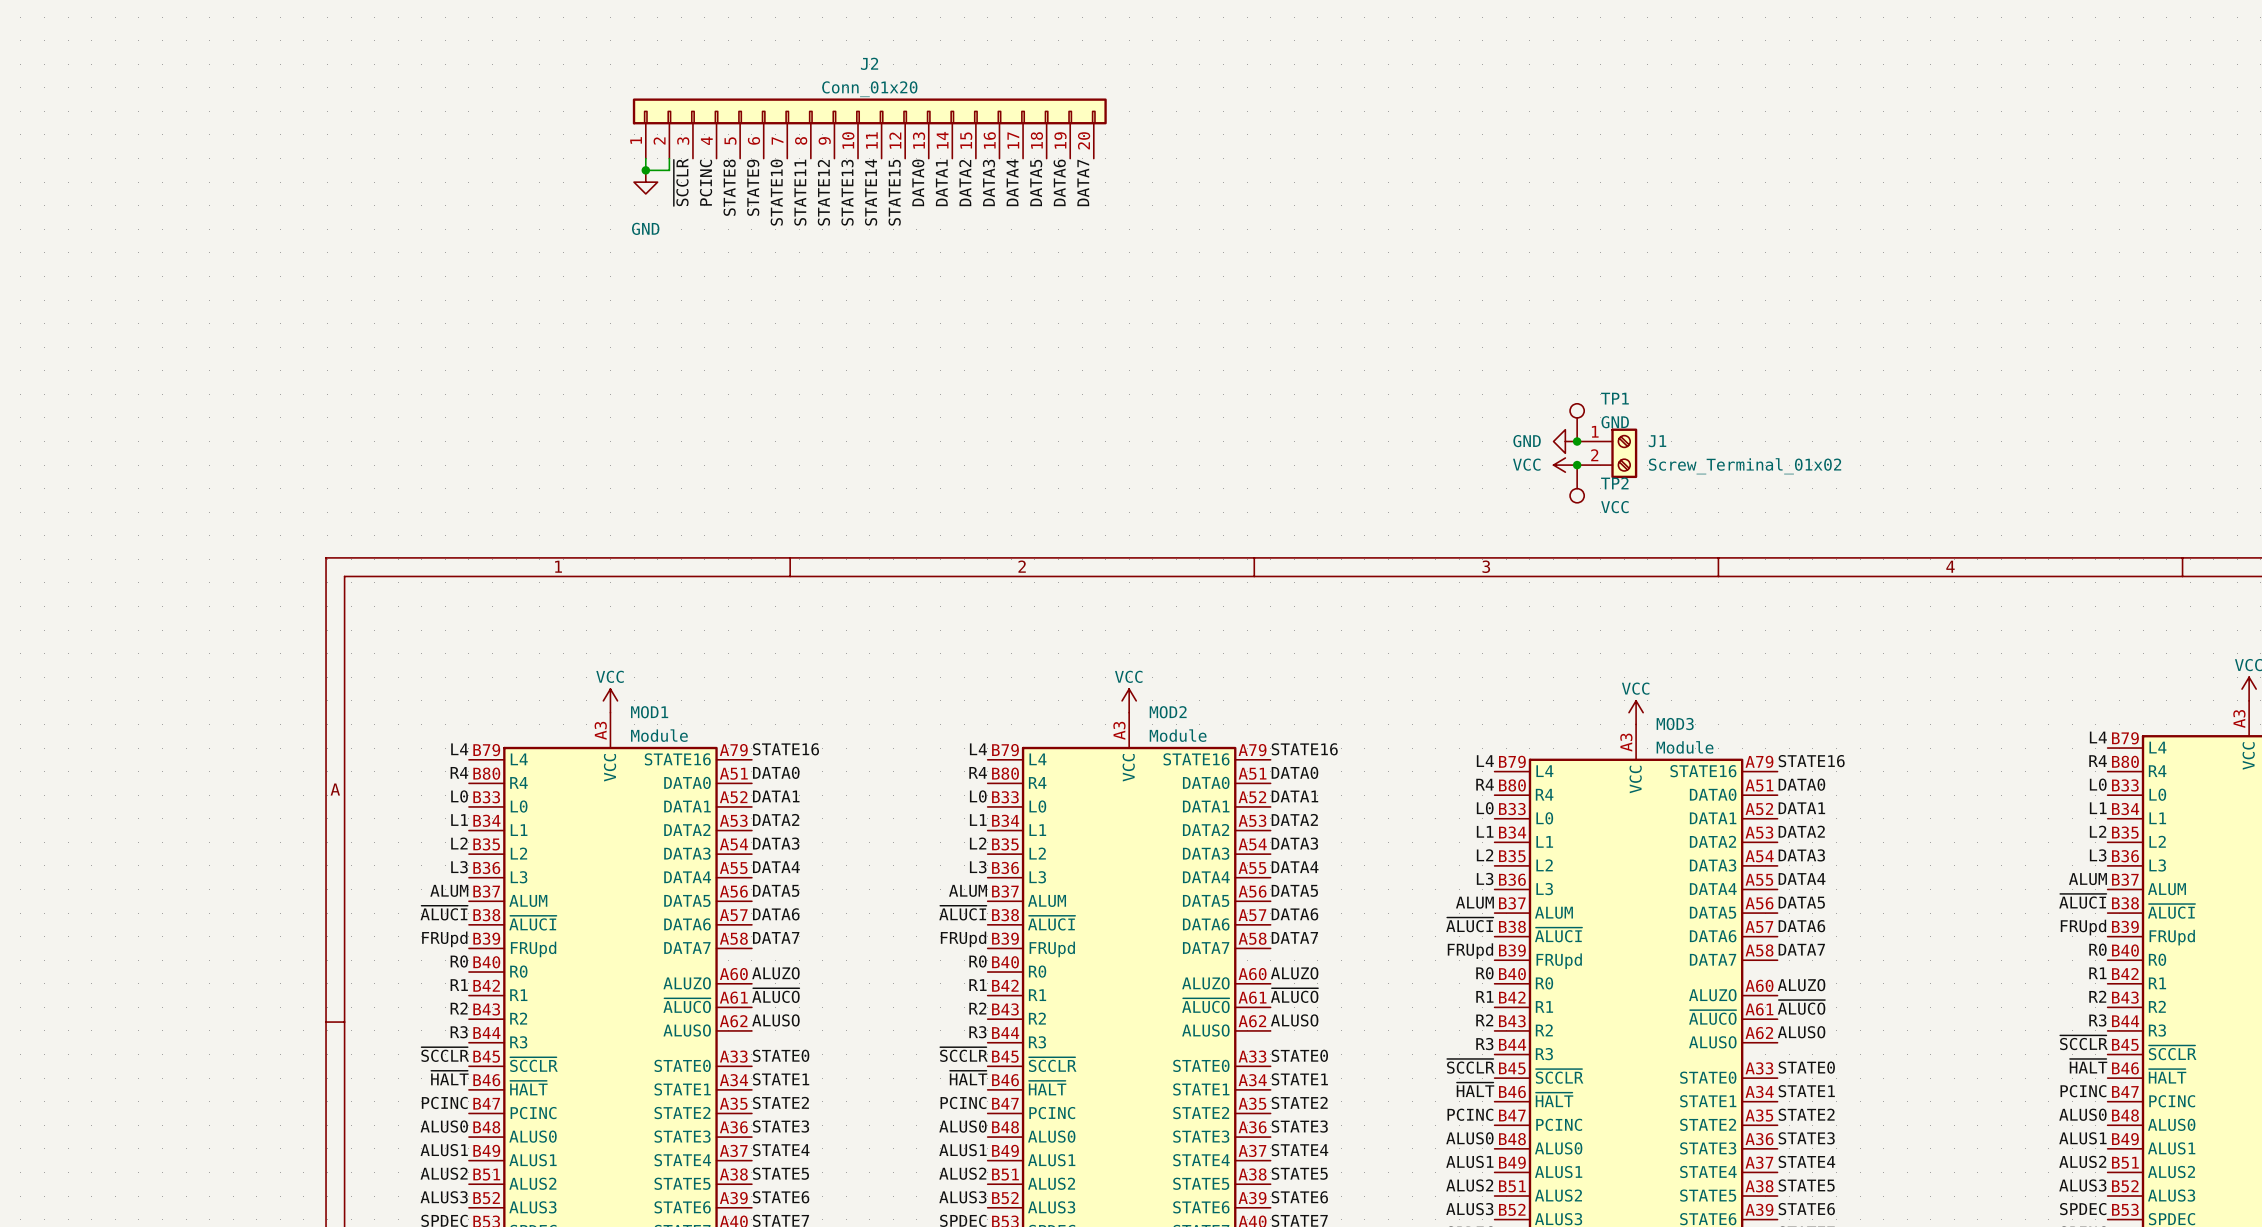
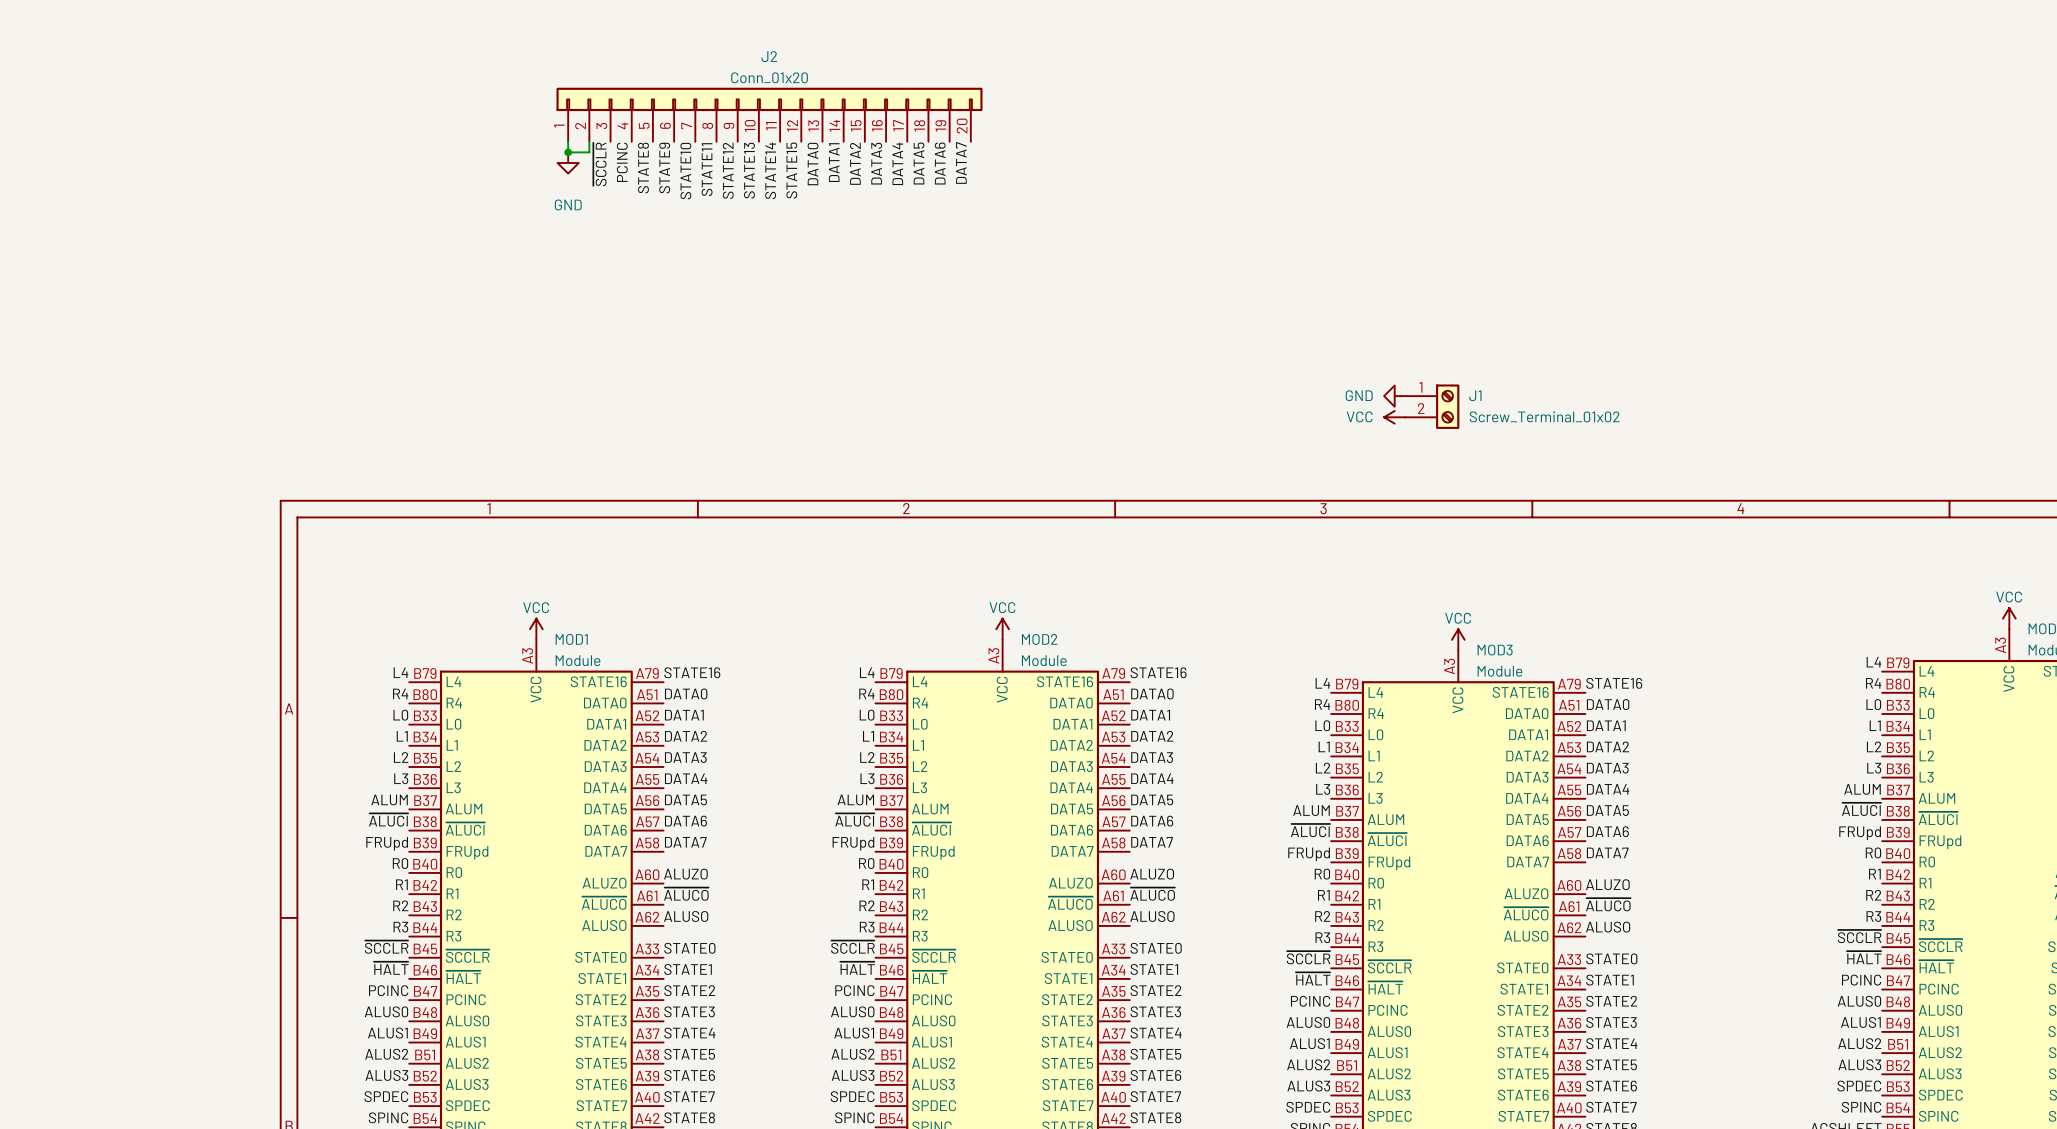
TP1: GND (1577, 422) -> none
junction: (1577, 441) -> none
junction: (1577, 465) -> none
TP2: VCC (1577, 483) -> none

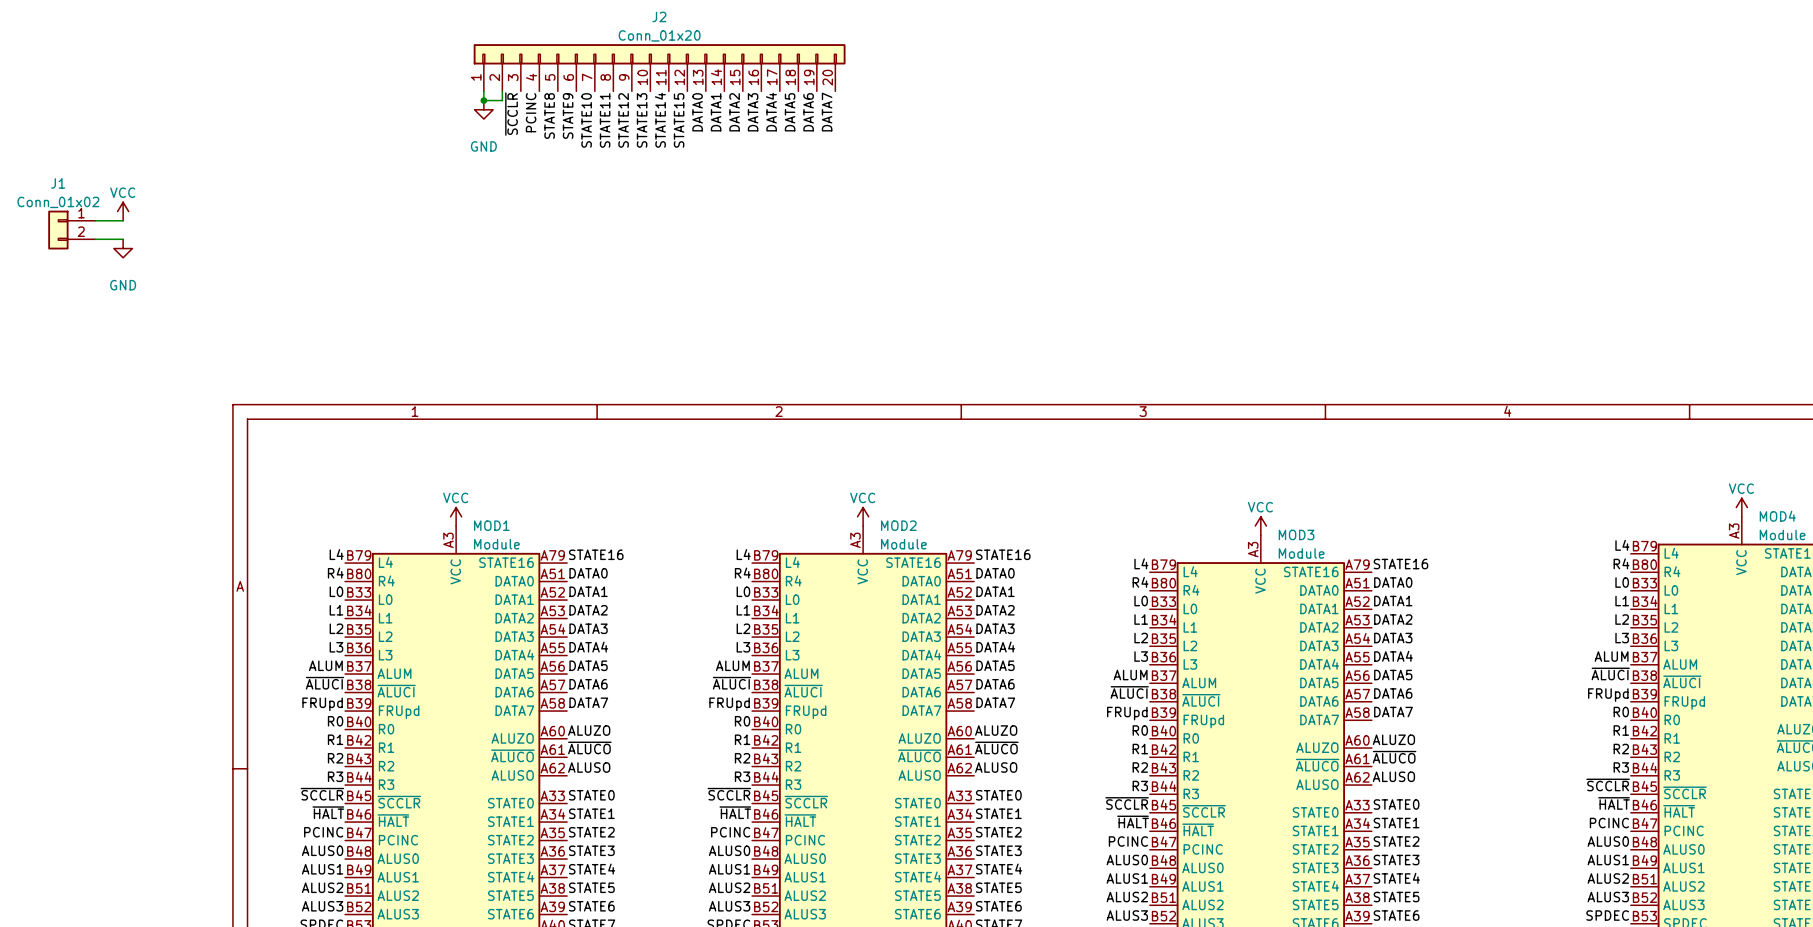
power symbol: none -> VCC (123, 211)
wire: none -> (95, 220) (123, 220)
wire: none -> (95, 239) (123, 239)
power symbol: none -> GND (123, 248)
J1 symbol: [1405, 384, 1460, 429] -> [48, 210, 96, 250]
J1 name position: J1 (1475, 395) -> J1 (58, 183)
power symbol: GND (1394, 396) -> none
J1 value: Screw_Terminal_01x02 (1544, 416) -> Conn_01x02 (58, 202)
power symbol: VCC (1394, 417) -> none

